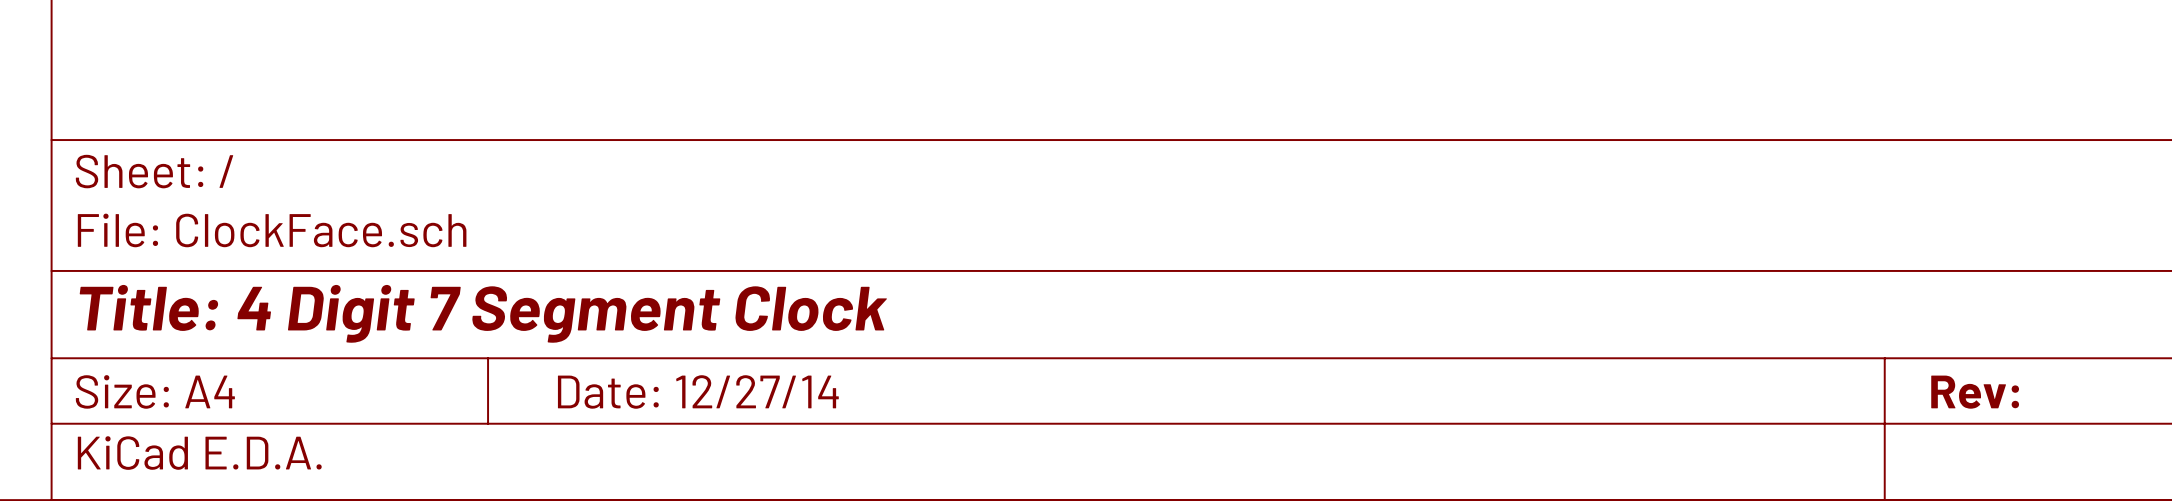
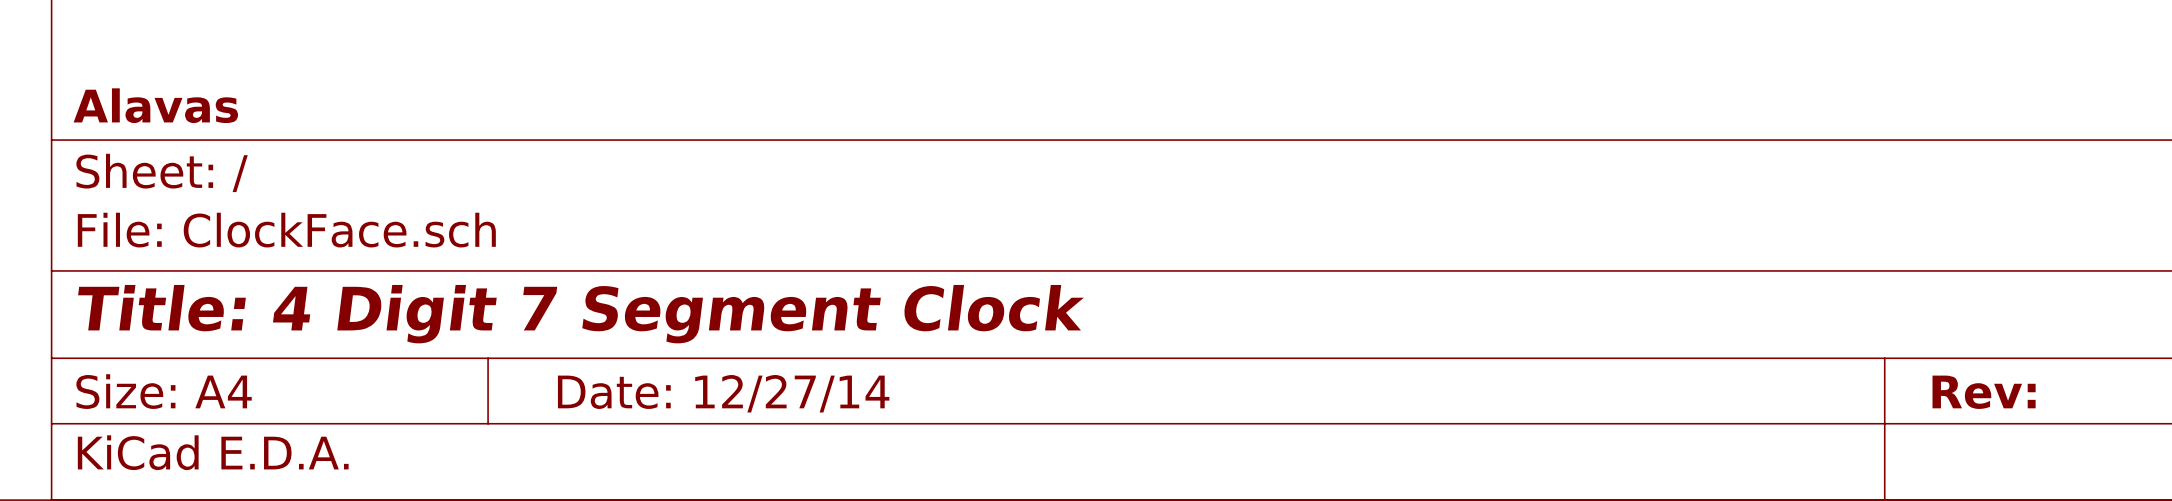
title block: none -> Alavas (155, 105)

